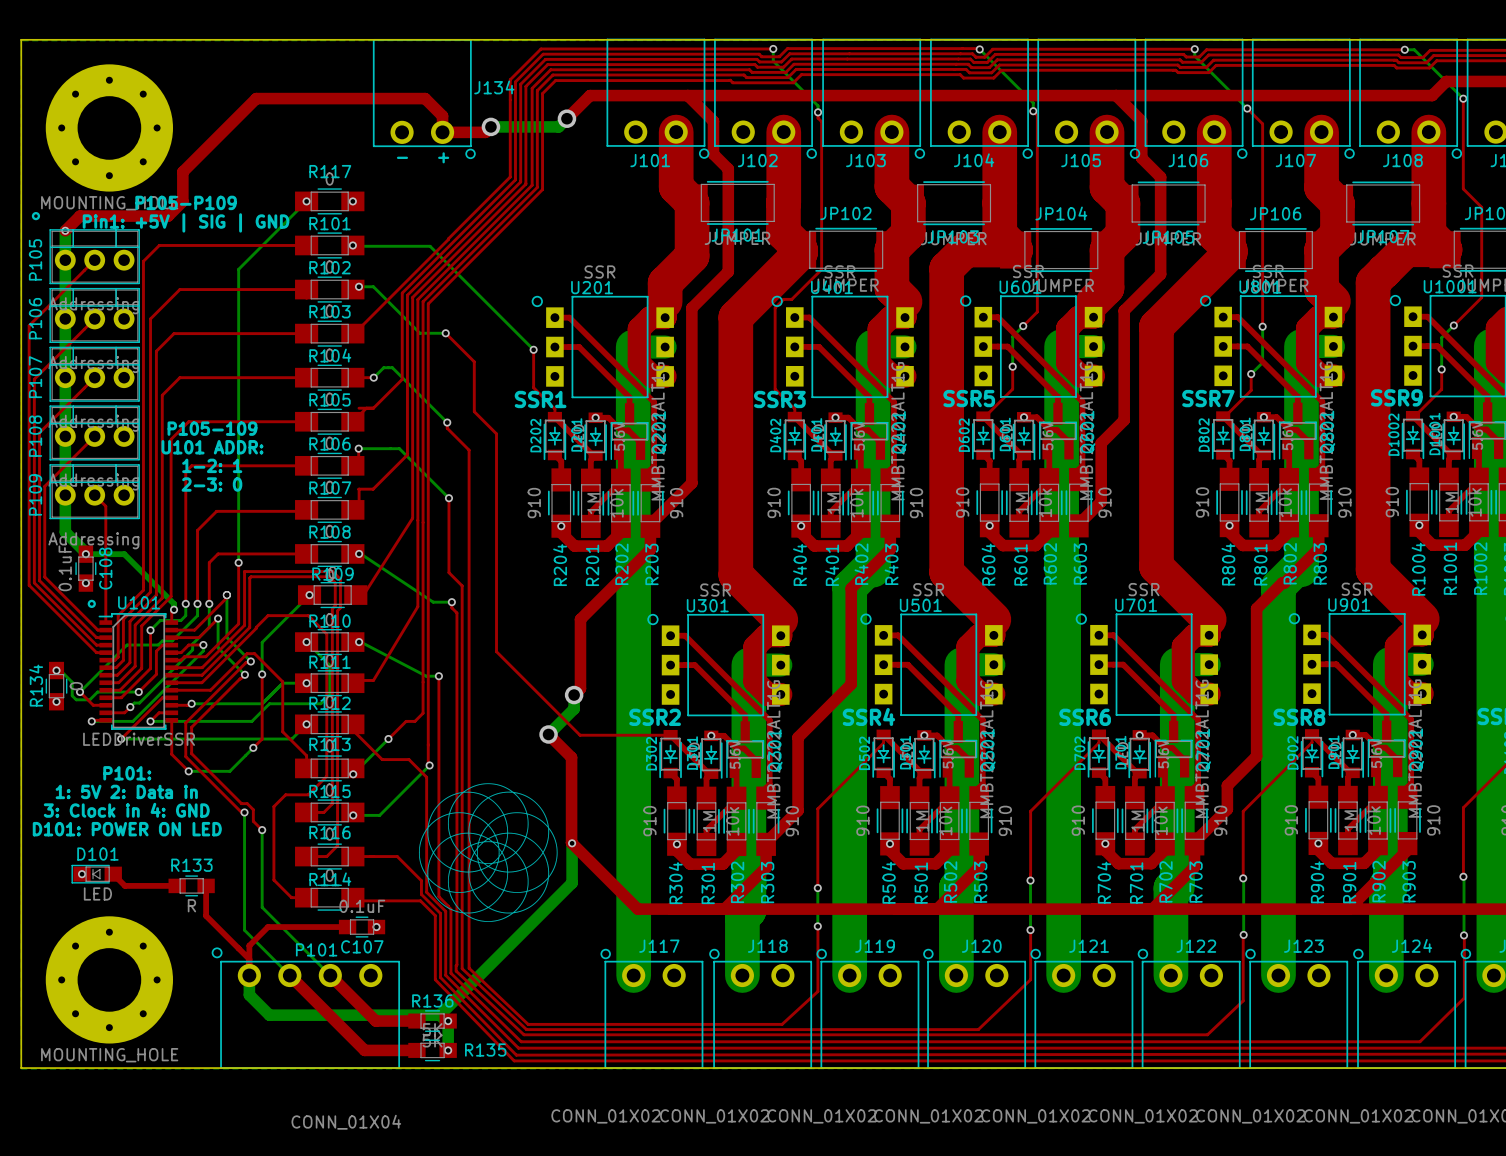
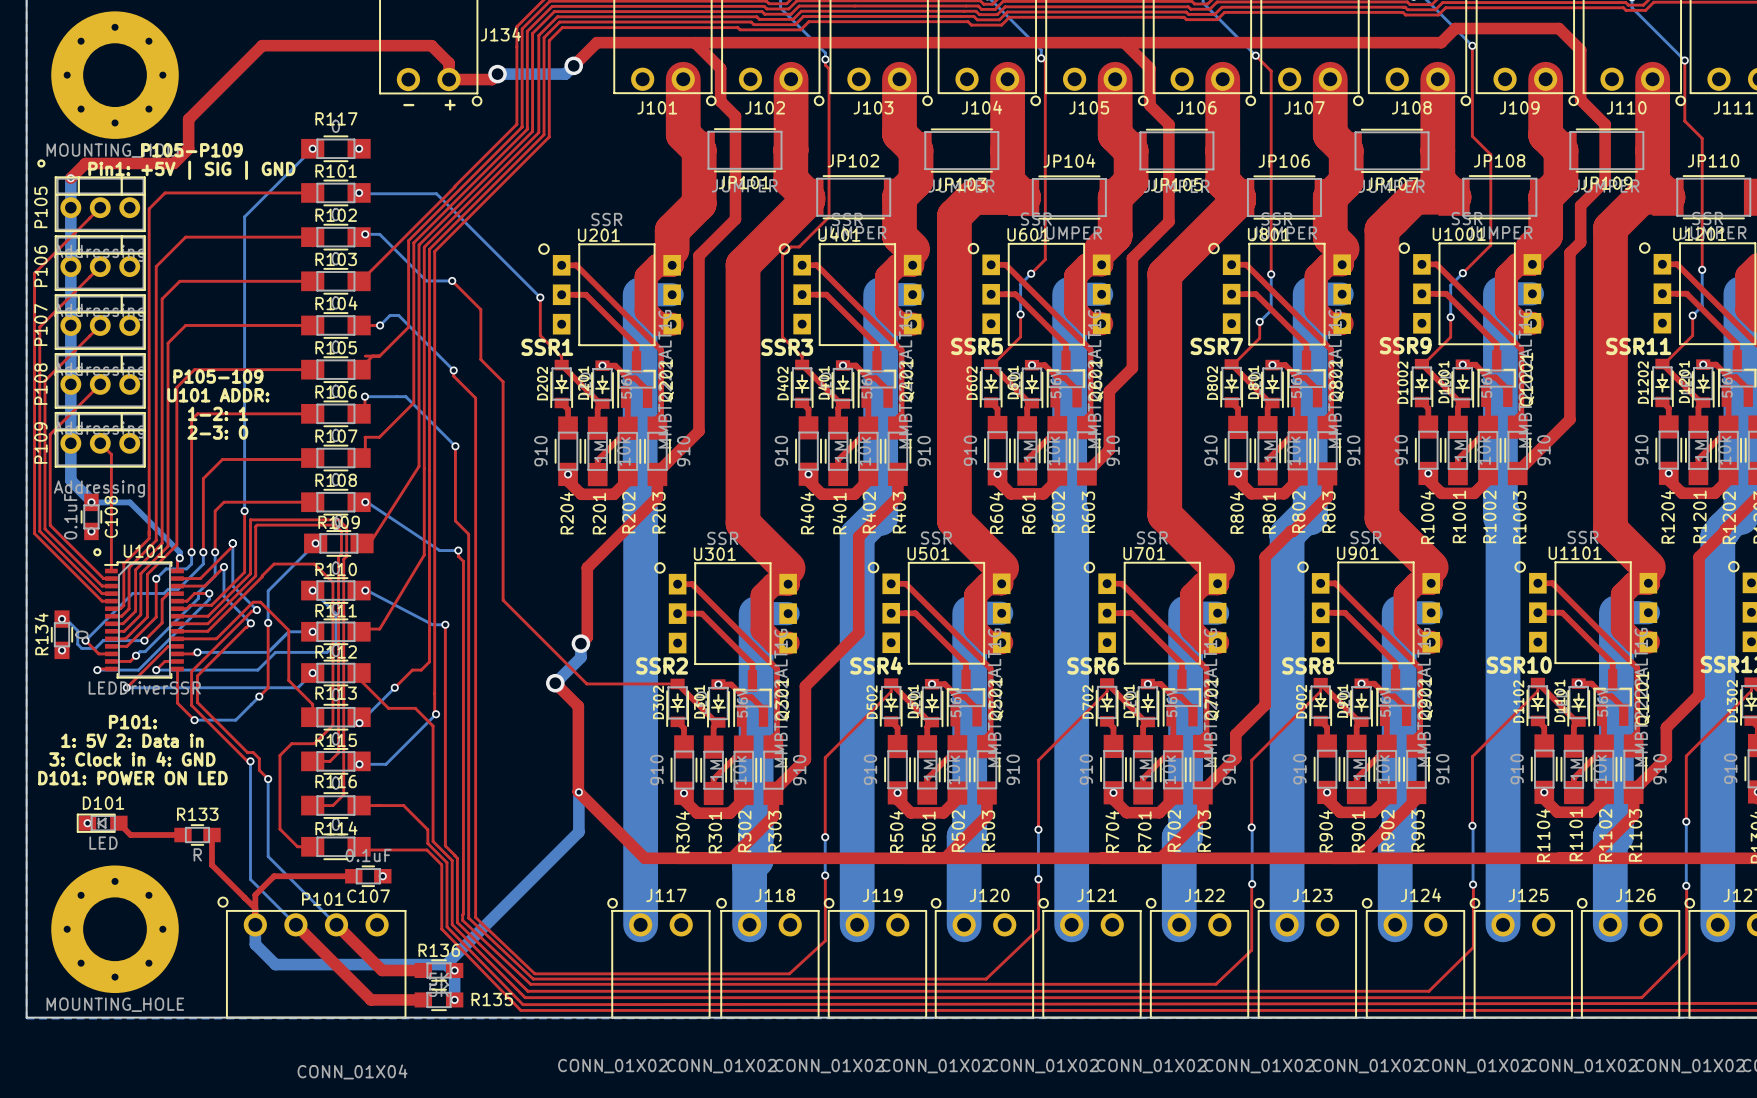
drawing: [418, 783, 558, 922] -> none

